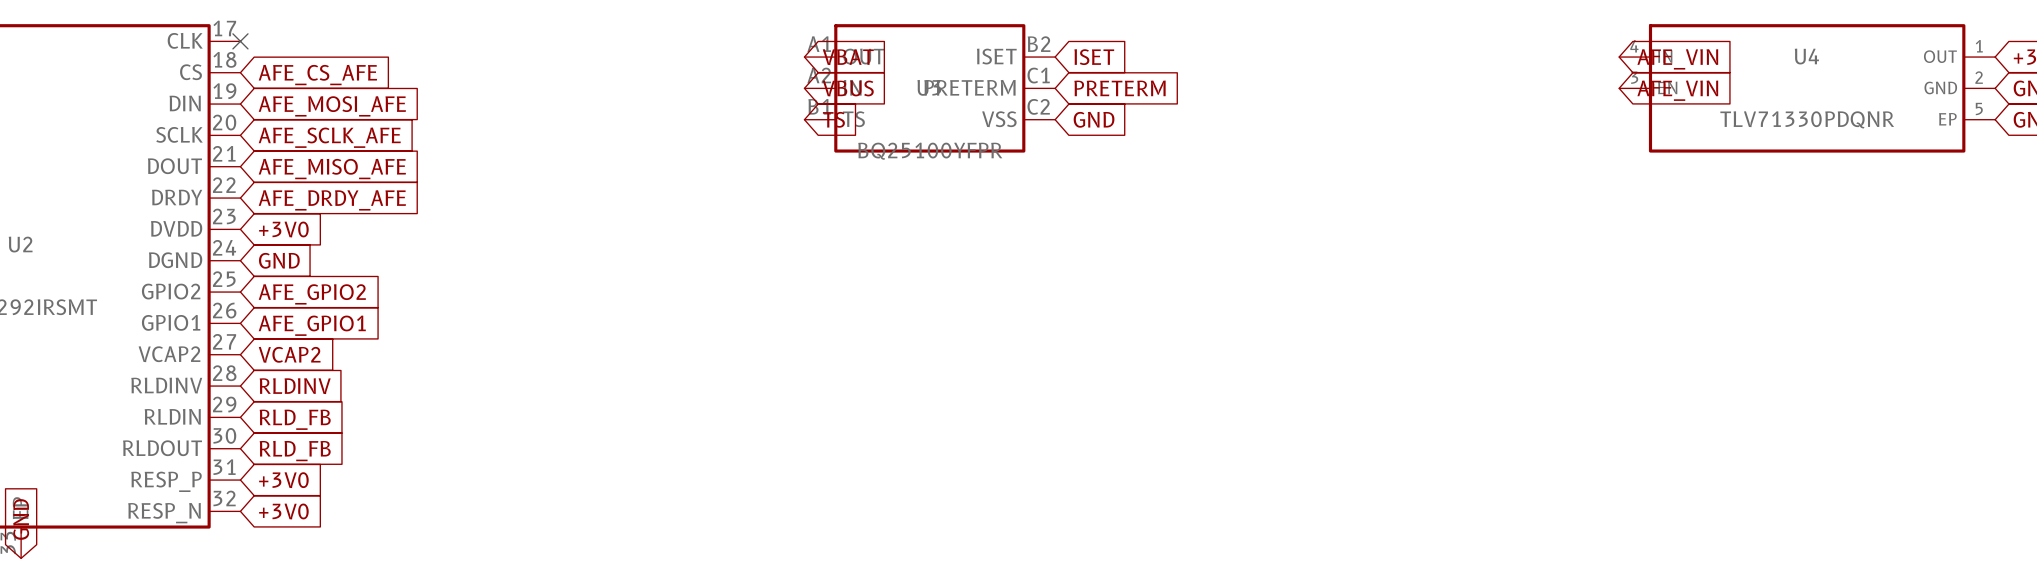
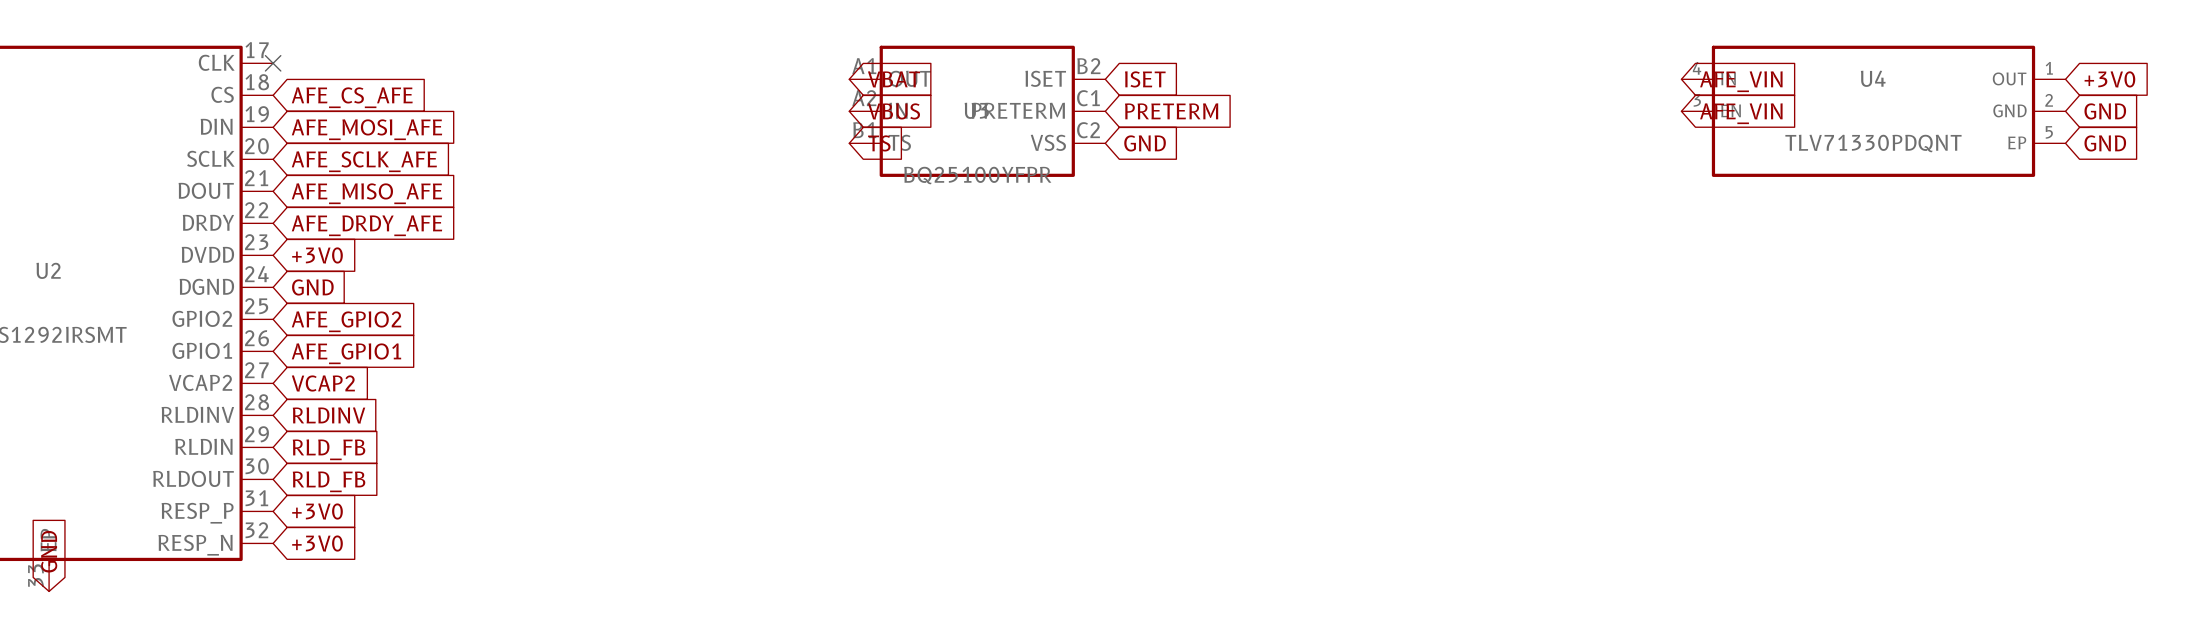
U4 value: TLV71330PDQNR (1807, 119) -> TLV71330PDQNT (1873, 143)

